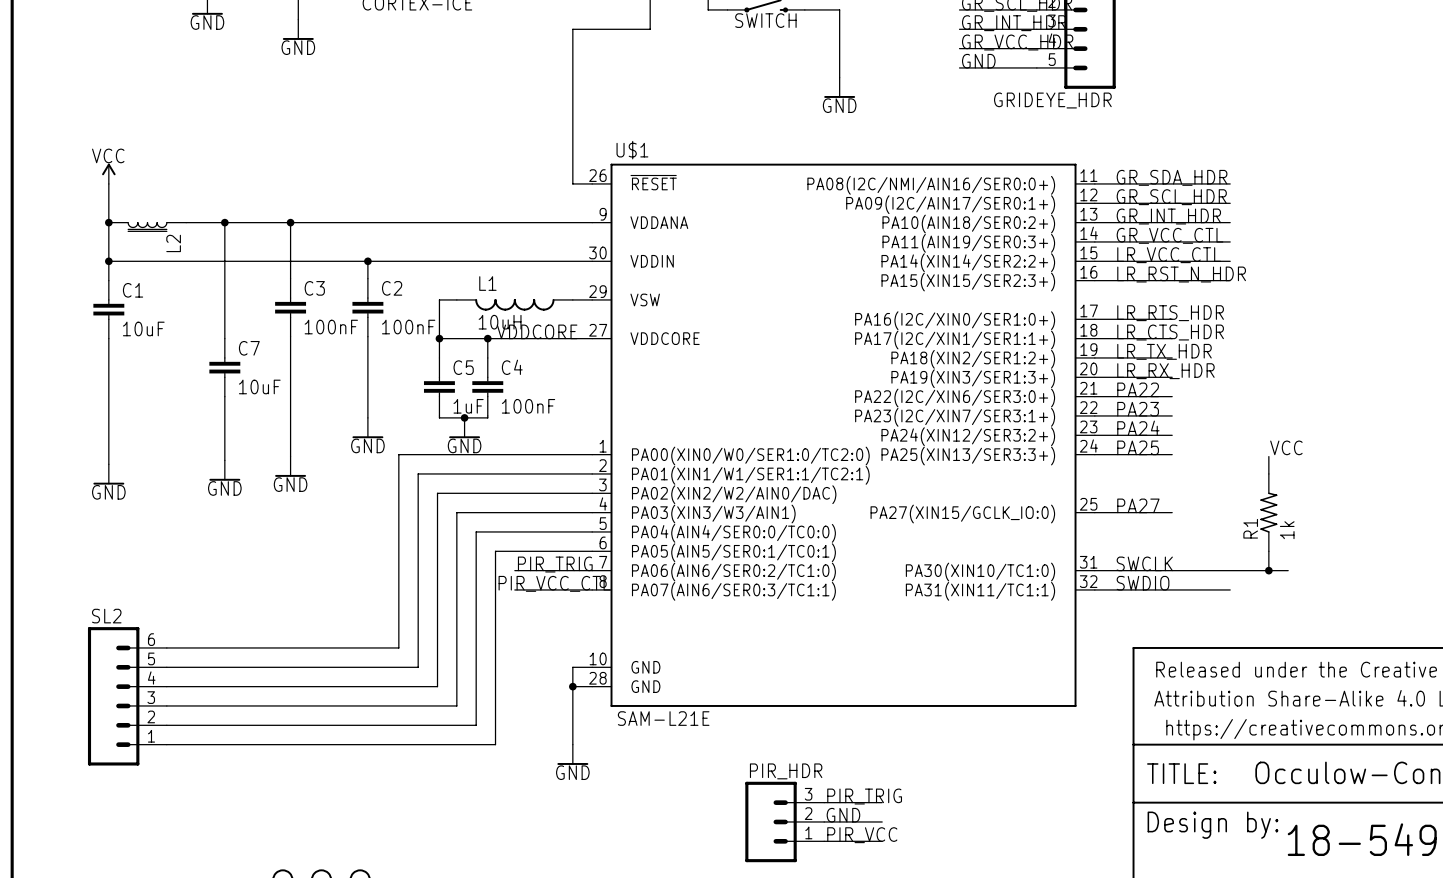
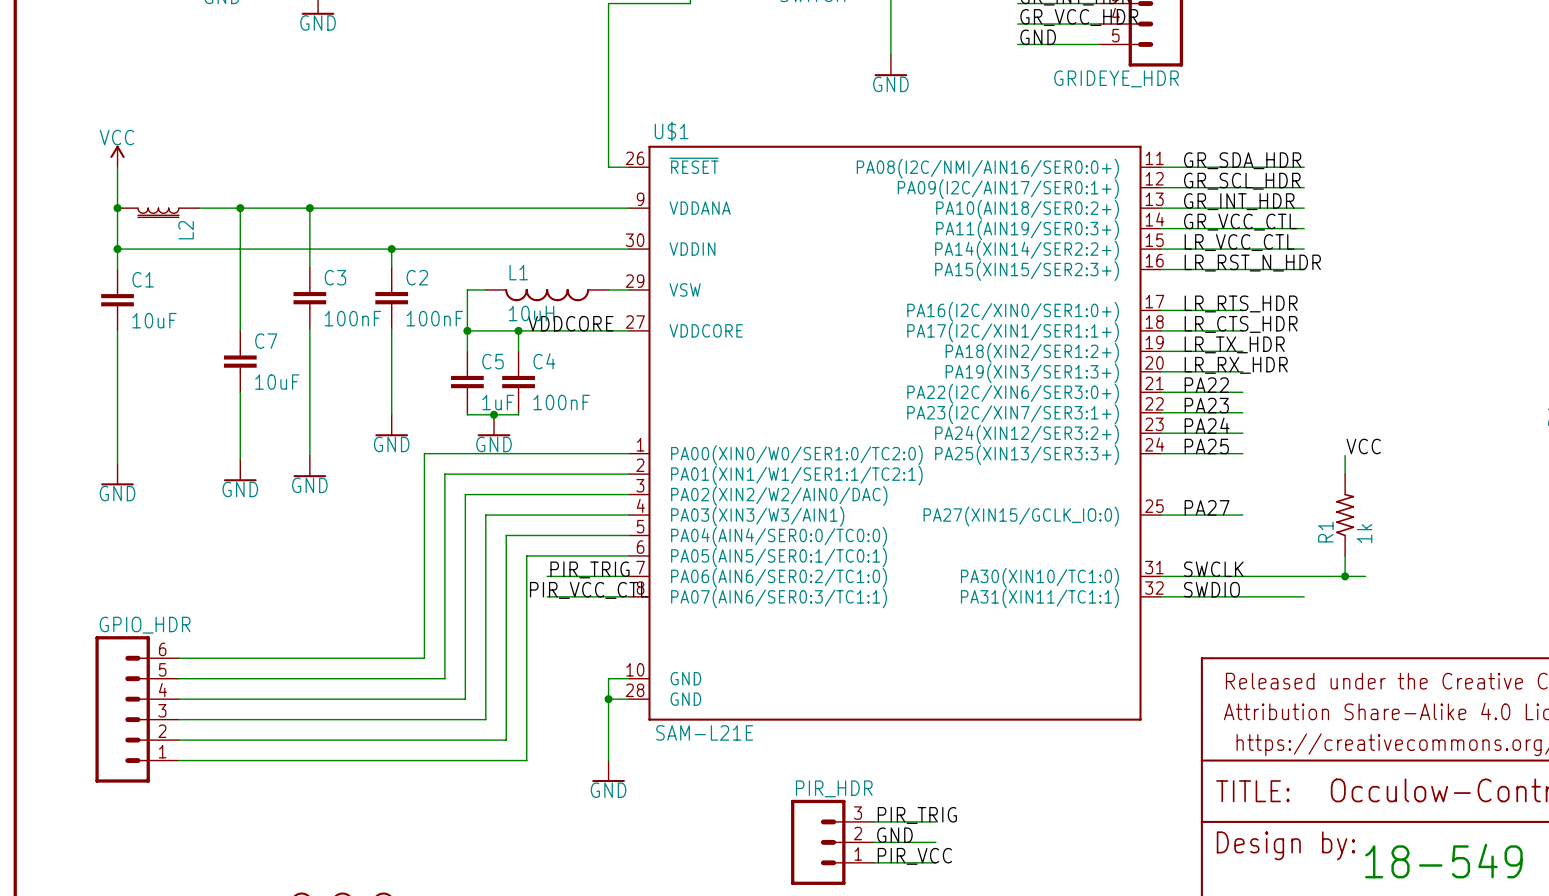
SL2 name: SL2 (106, 616) -> GPIO_HDR (145, 625)

